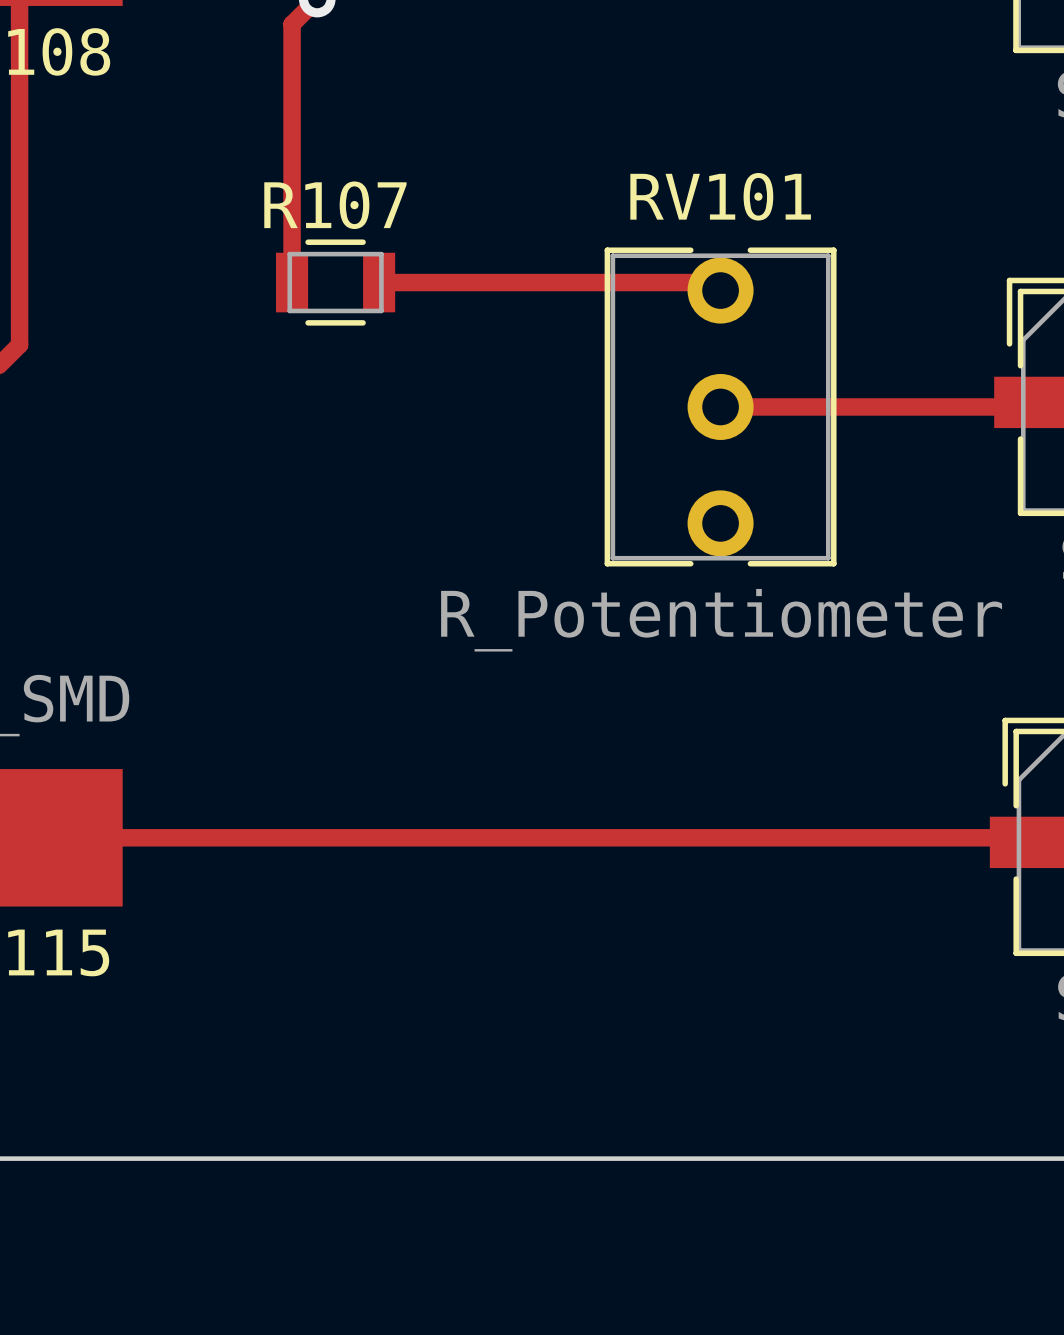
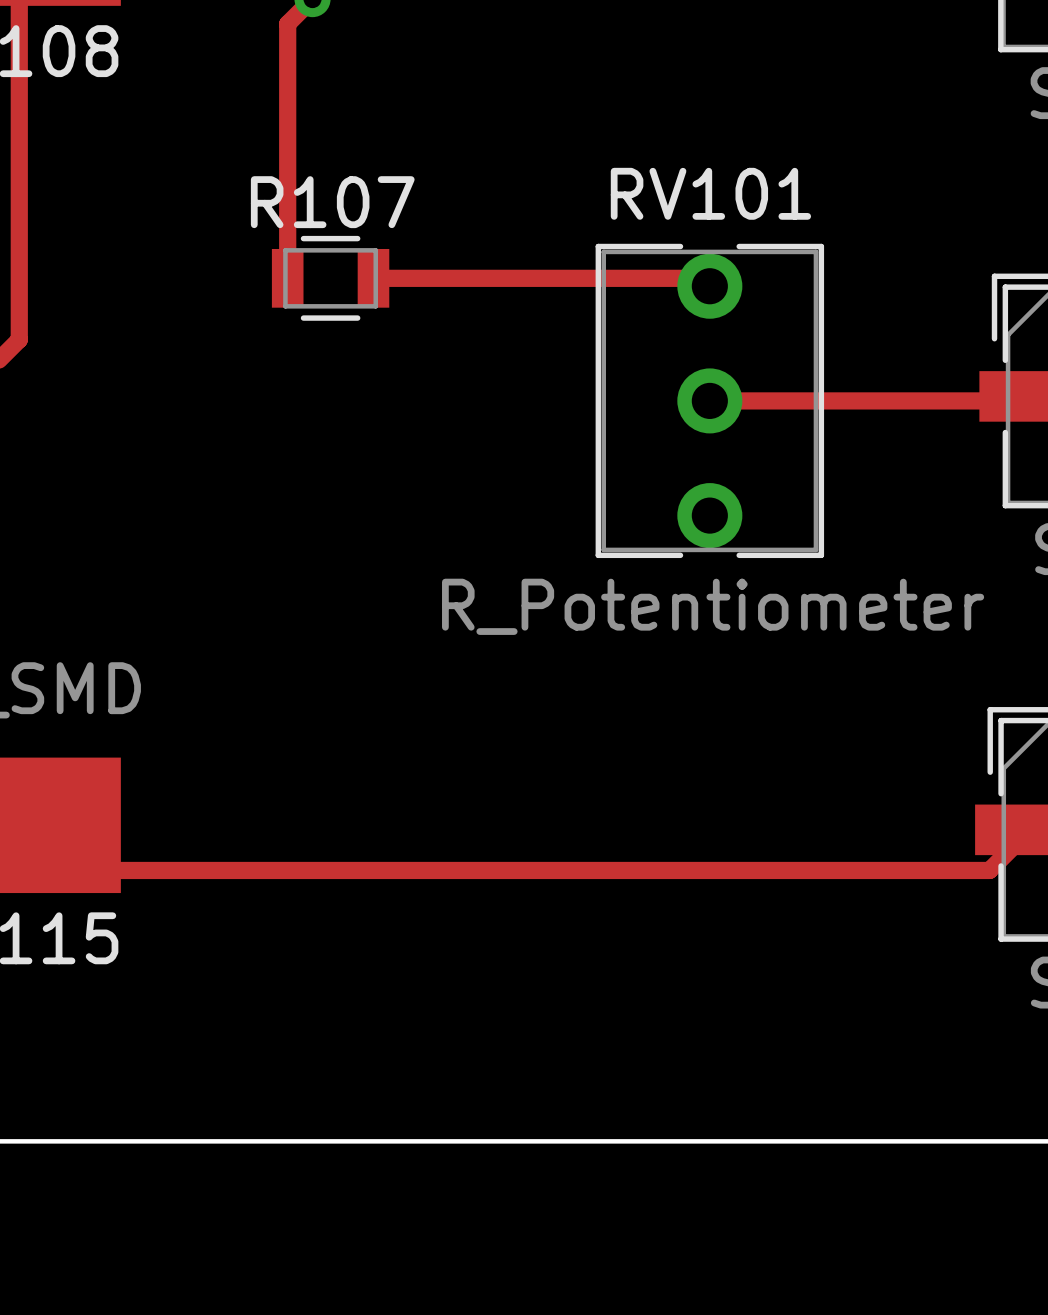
track: (19, 837) (1041, 837) (1045, 842) -> (19, 825) (64, 870) (989, 870) (1030, 829)

